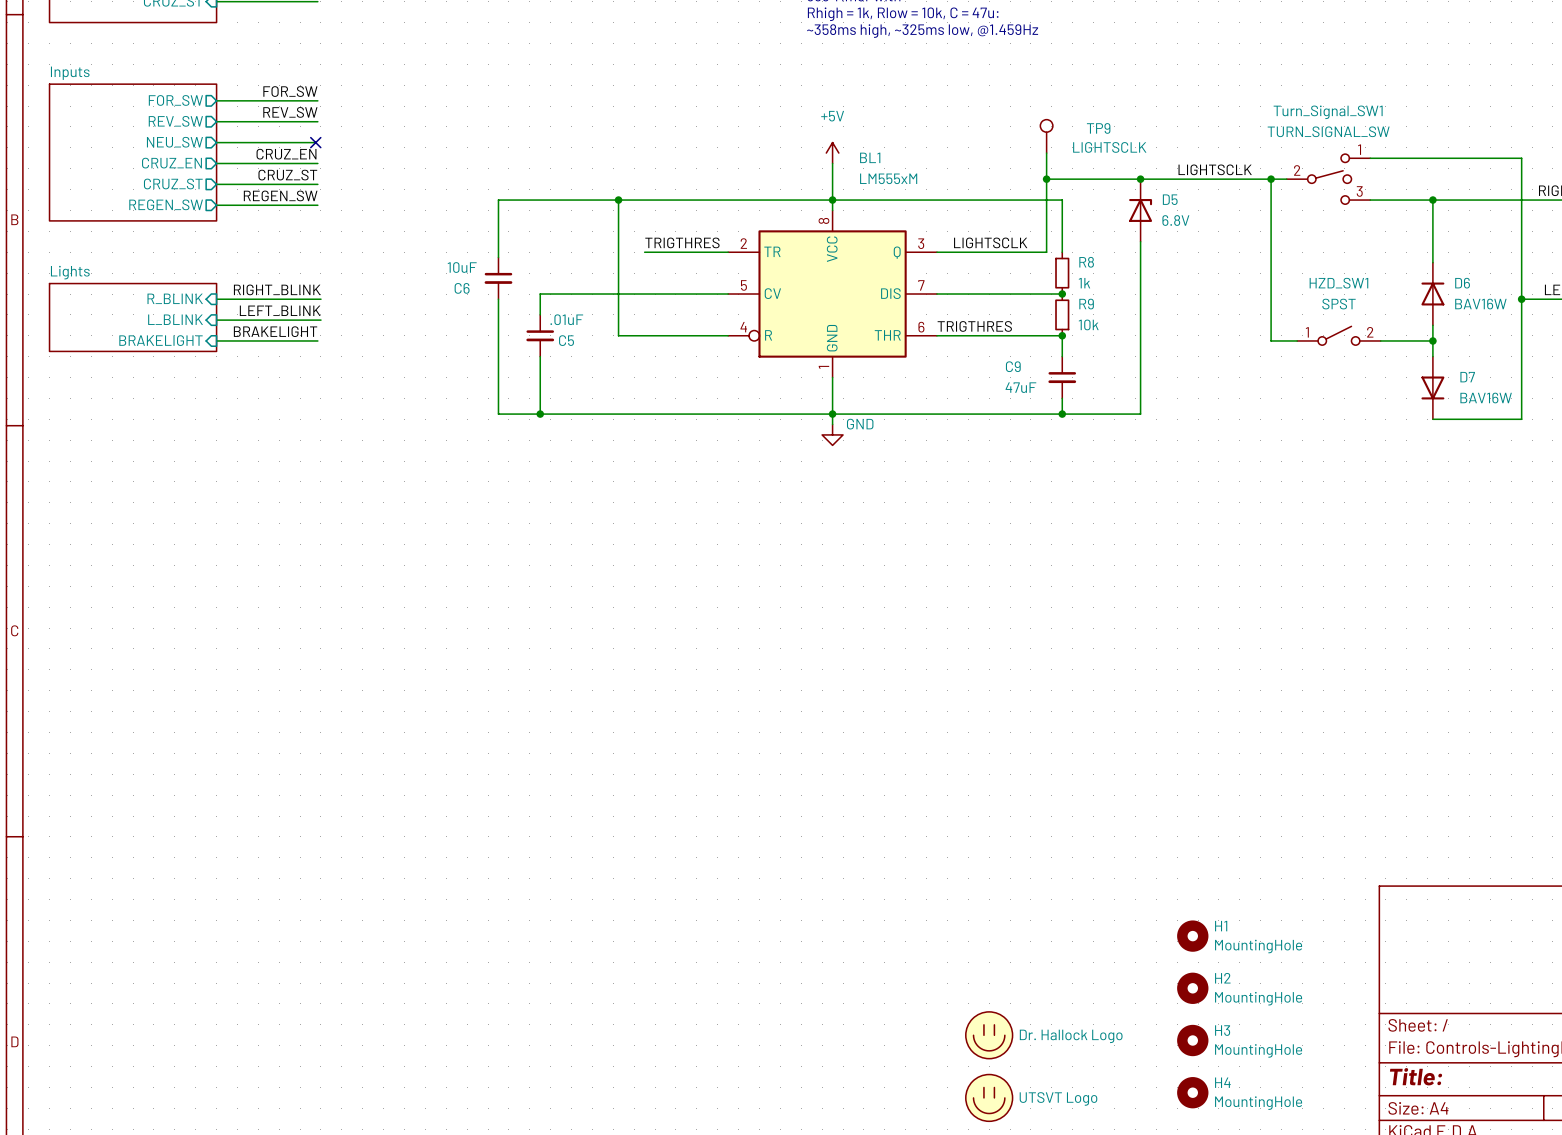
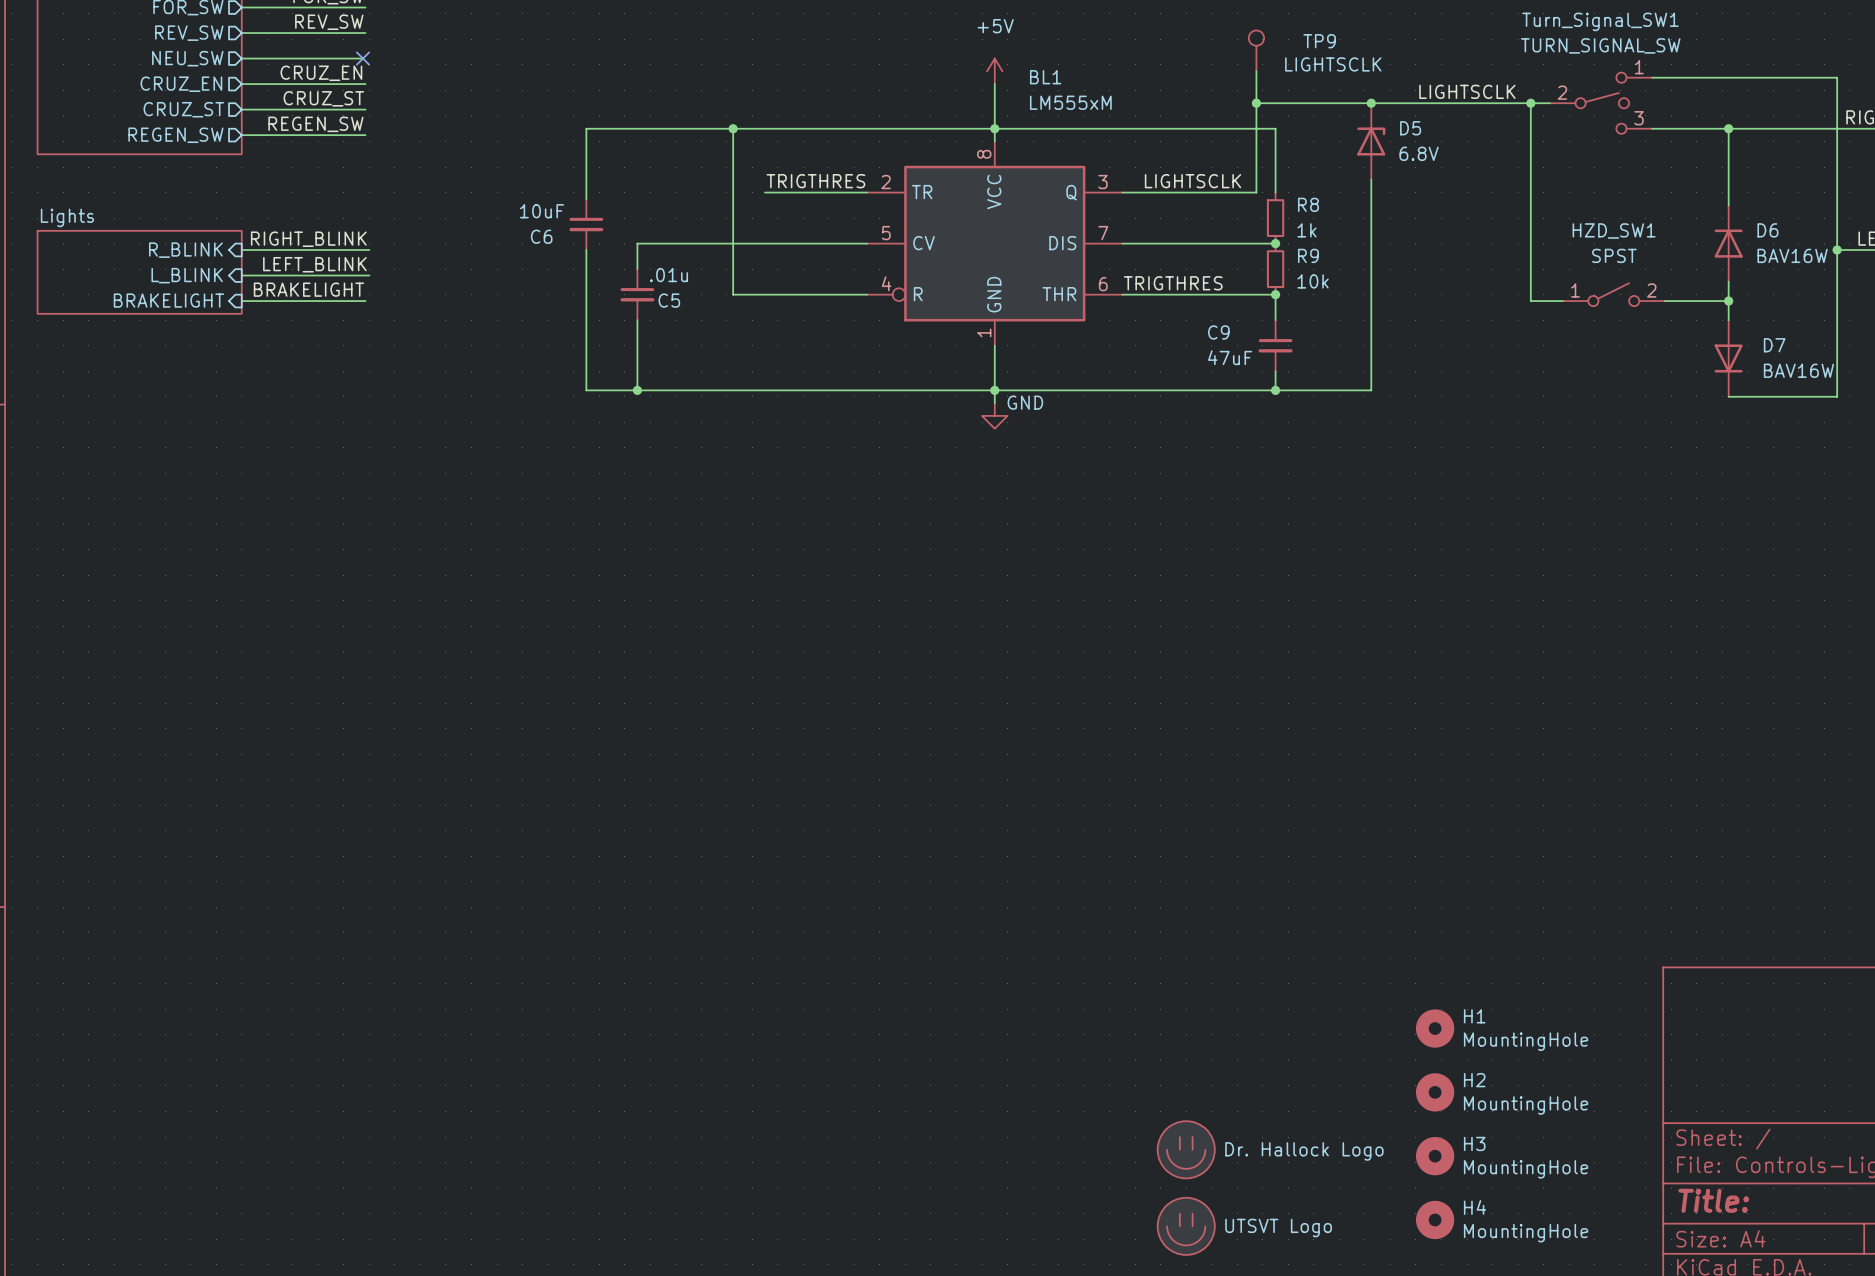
C5 value: .01uF (566, 319) -> .01u (669, 275)

